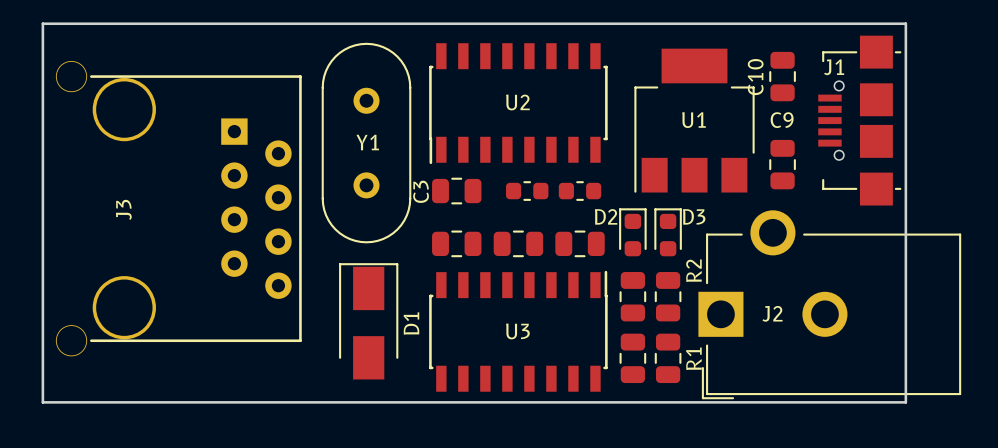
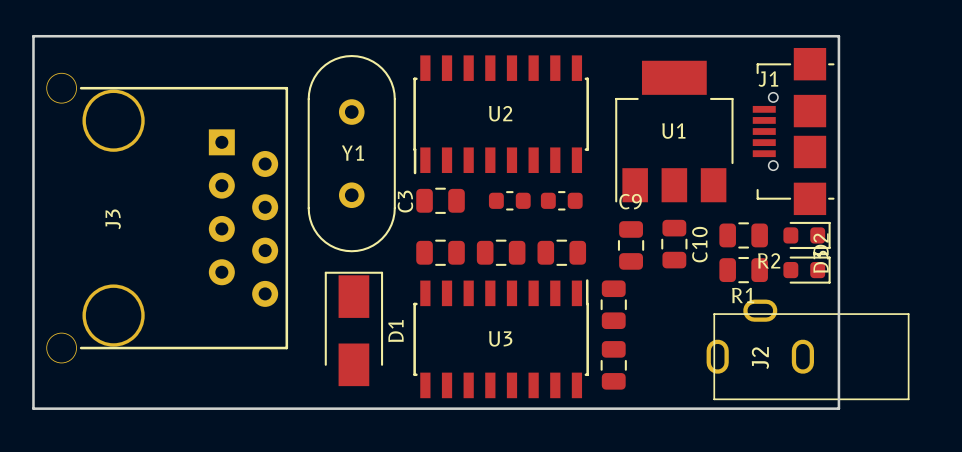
board edge: (861, 23) (905, 23) (905, 402) (861, 402) -> (838, 36) (838, 408)
C10 position: (782, 76) -> (674, 244)
C10 name position: C10 (755, 77) -> C10 (699, 244)
J1 position: (859, 120) -> (793, 131)
C9 position: (782, 164) -> (631, 245)
J2 footprint: [698, 210, 962, 400] -> [706, 299, 910, 401]
D2 rotation: 0° (632, 232) -> 90° clockwise (807, 270)
D2 position: (632, 232) -> (807, 270)
D3 rotation: 0° (668, 232) -> 90° clockwise (807, 235)
D3 position: (668, 232) -> (807, 235)
R2 rotation: 0° (668, 296) -> 90° clockwise (743, 235)
R2 position: (668, 296) -> (743, 235)
R1 rotation: 0° (668, 358) -> 90° clockwise (743, 270)
R1 position: (668, 358) -> (743, 270)

